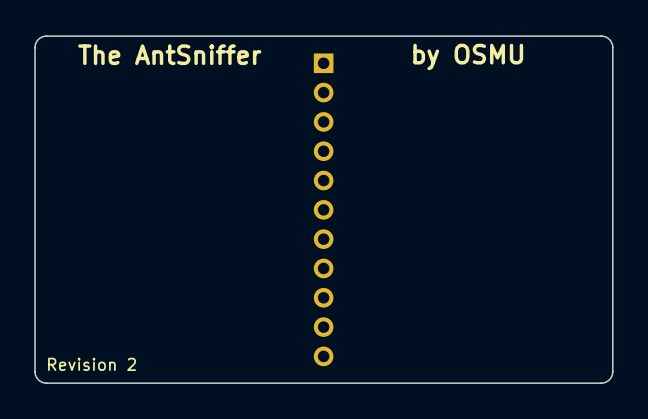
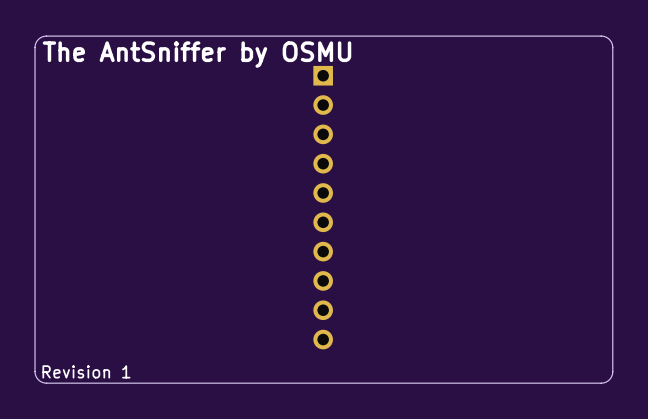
part footprint: [313, 53, 334, 367] -> [313, 65, 333, 350]
text: The AntSniffer (169, 54) -> The AntSniffer by OSMU (197, 54)
text: by OSMU (468, 57) -> none
text: Revision 2 (92, 364) -> Revision 1 (86, 371)

